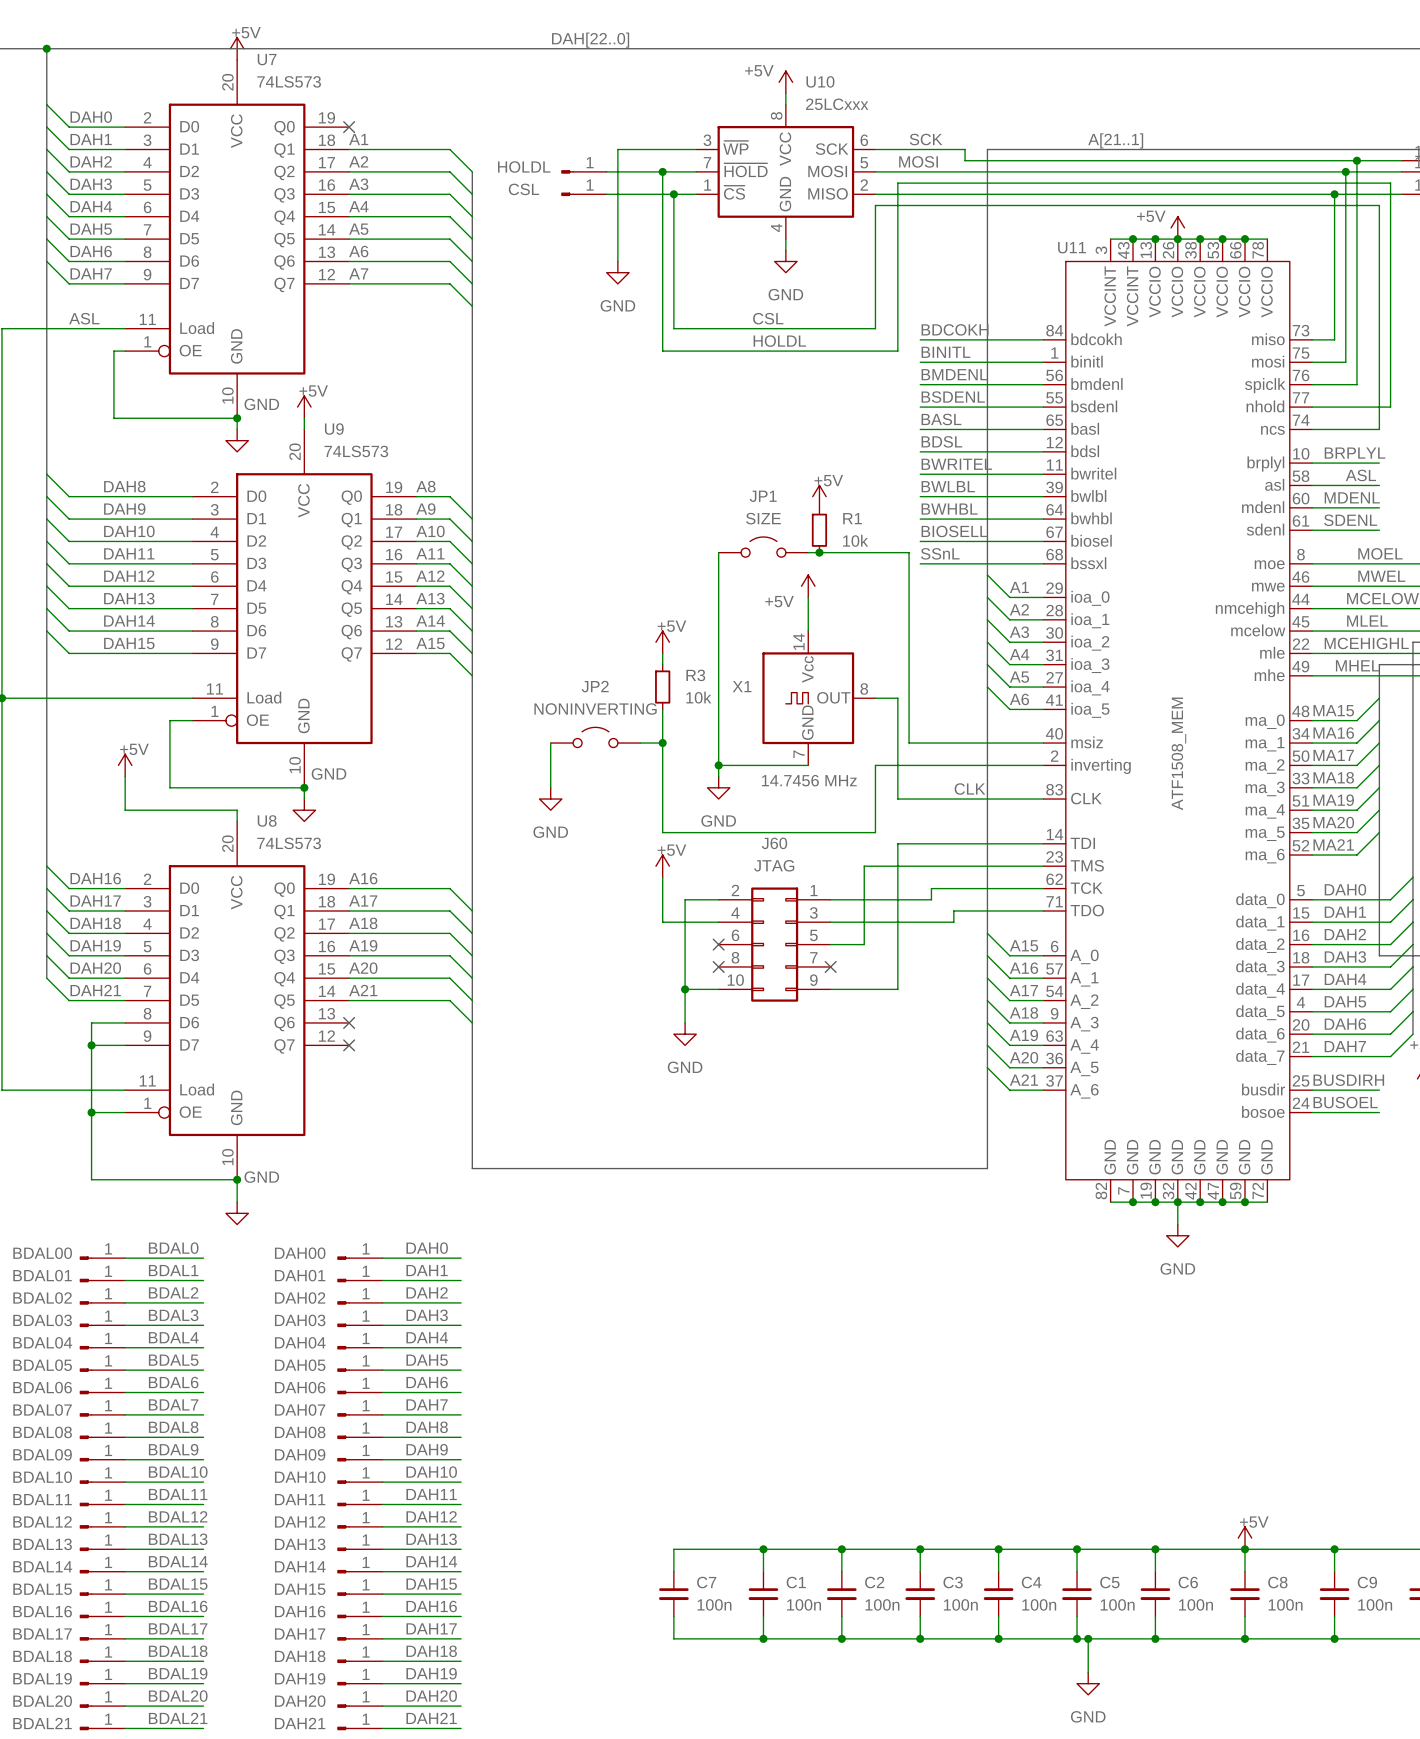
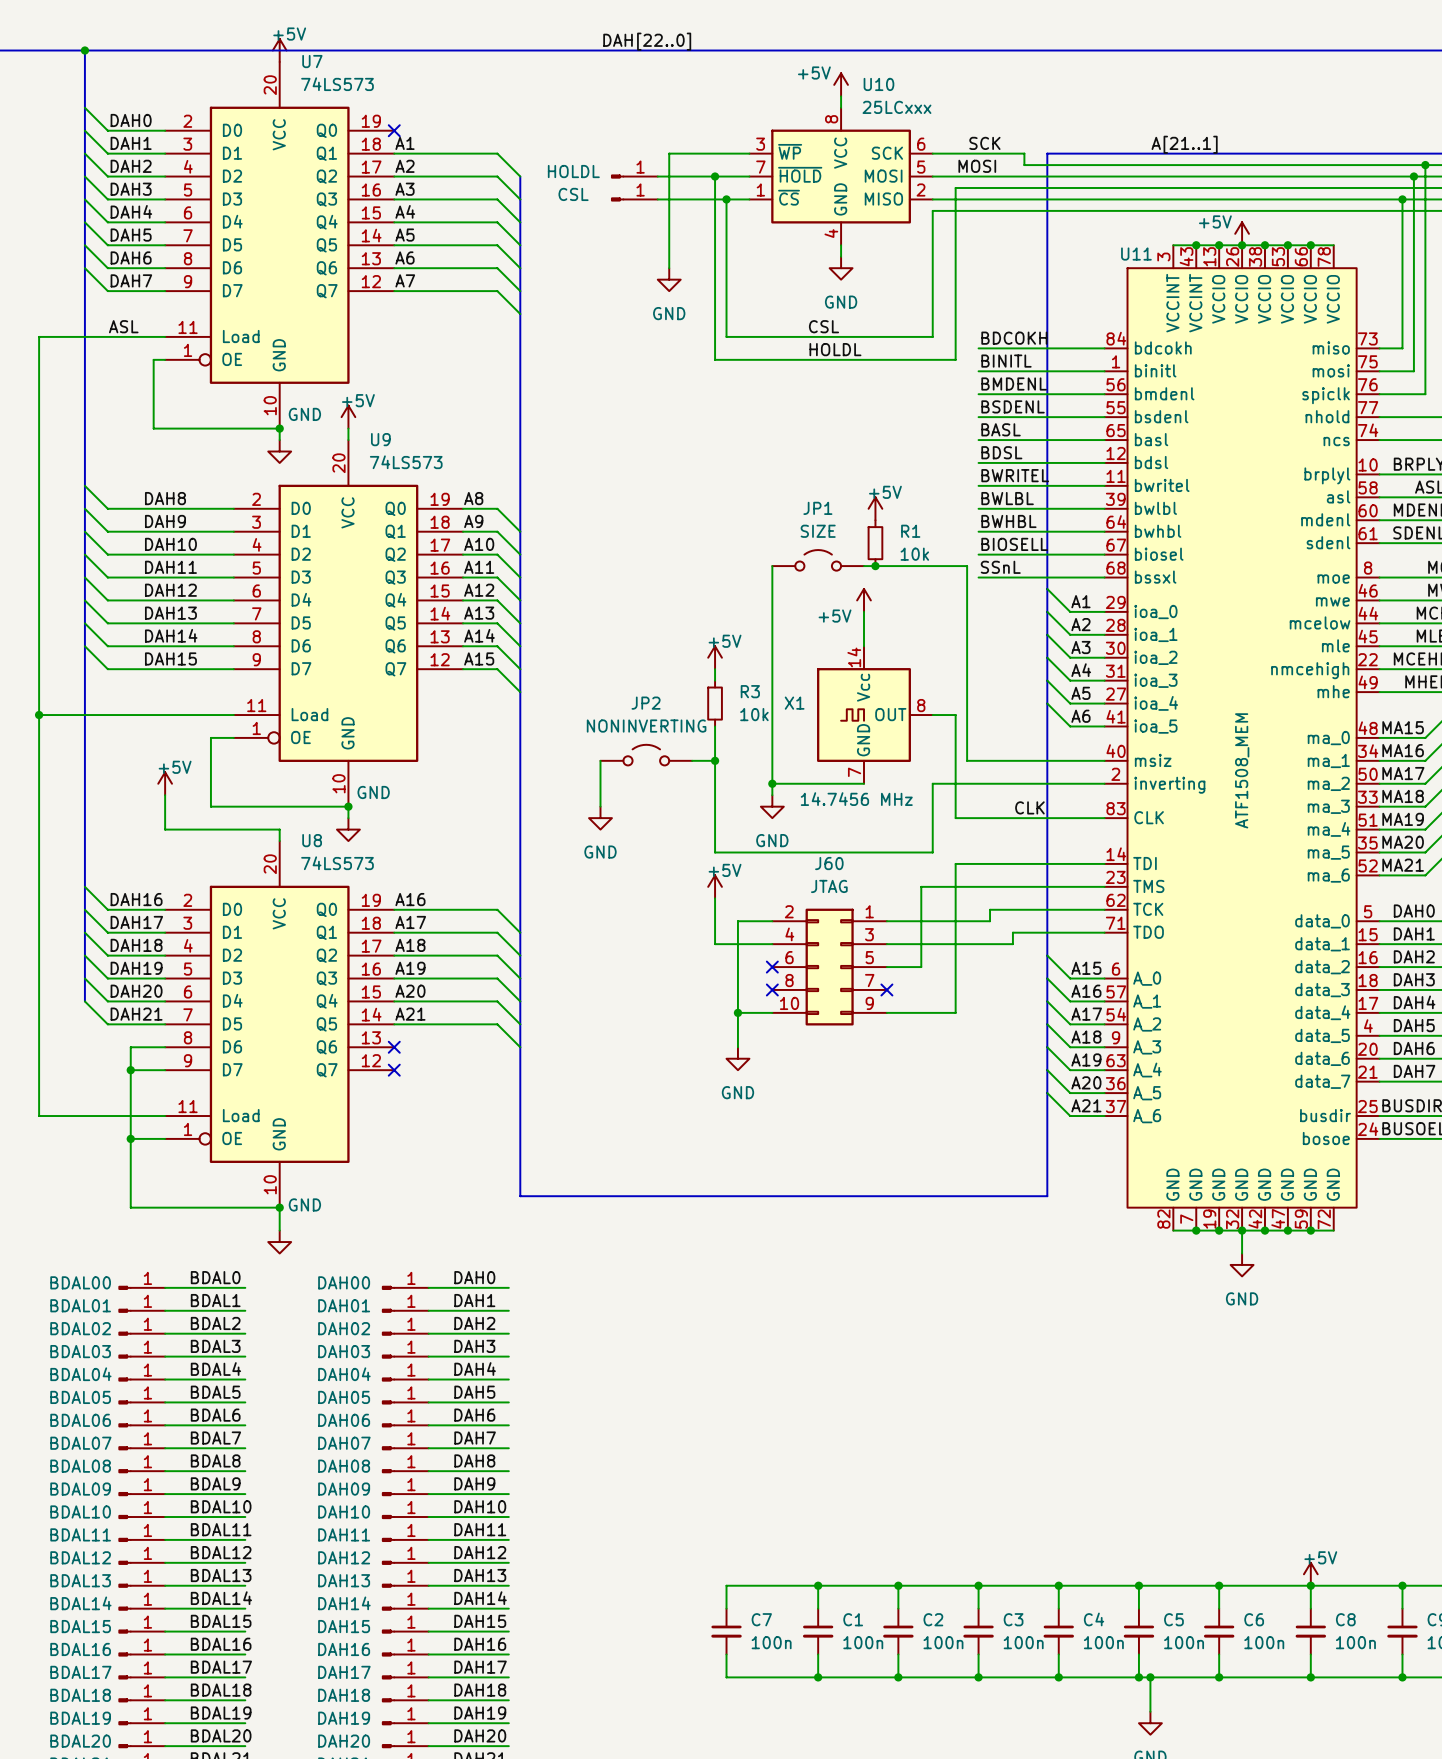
U11 pin name: nmcehigh (1250, 609) -> mcelow (1320, 622)
U11 pin name: mcelow (1258, 630) -> mle (1335, 645)
U11 pin name: mle (1272, 652) -> nmcehigh (1310, 670)

